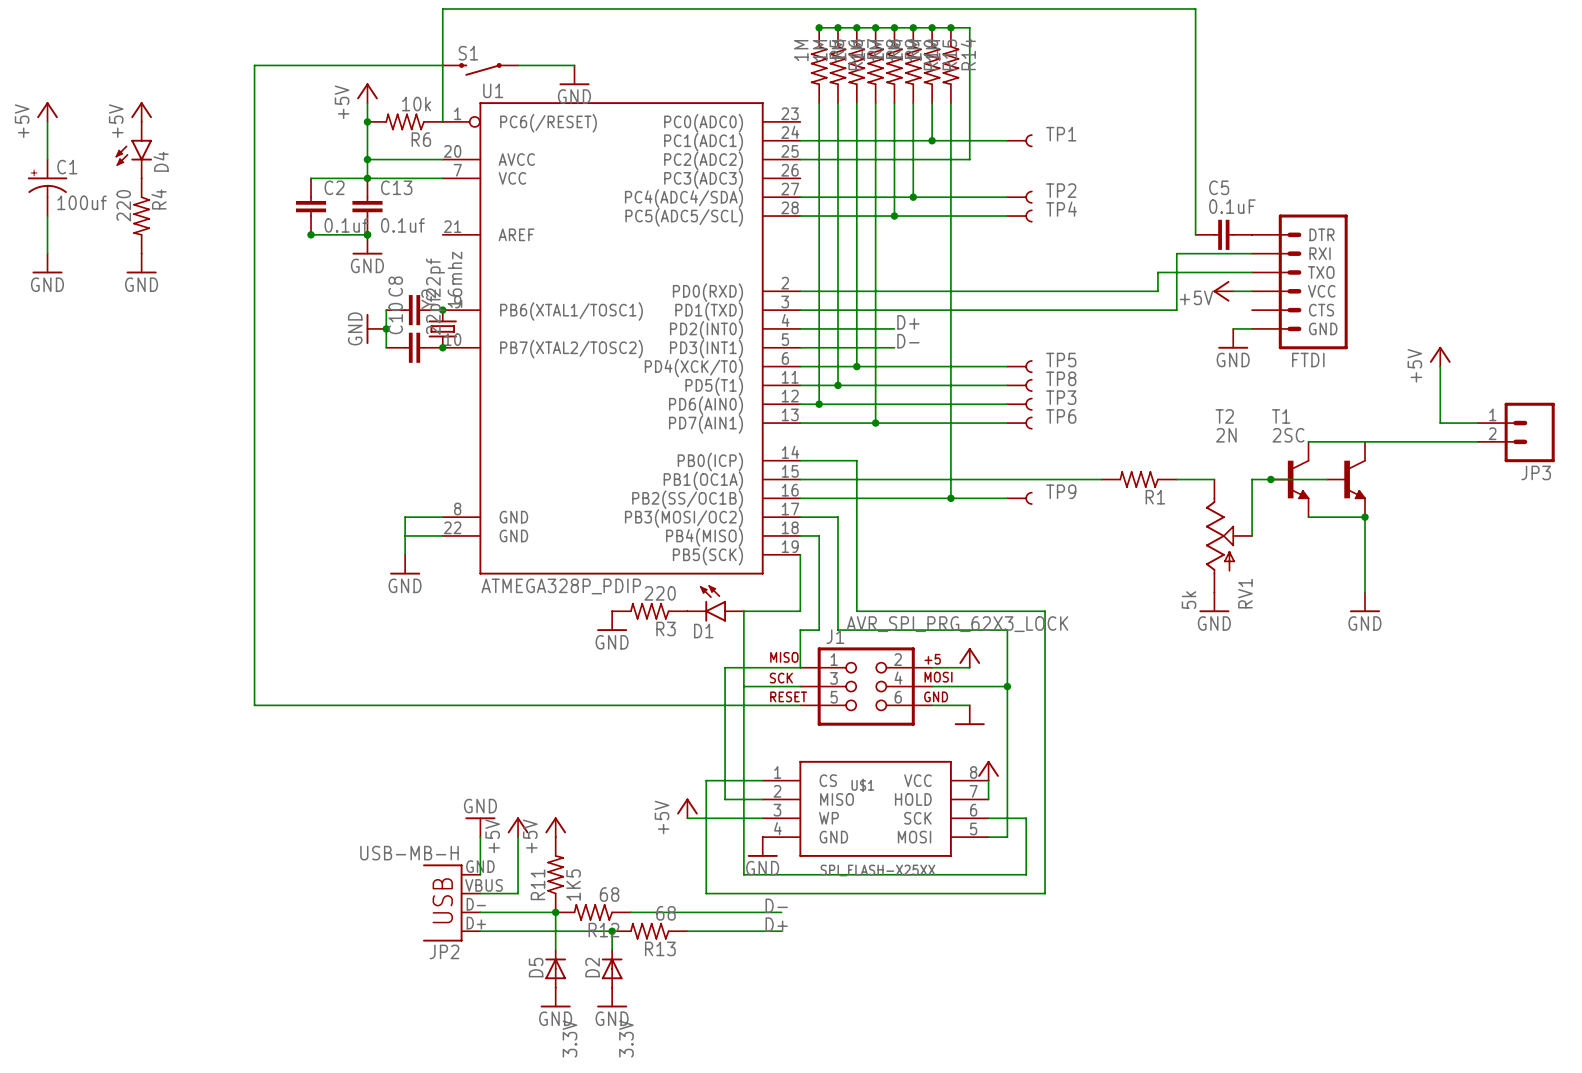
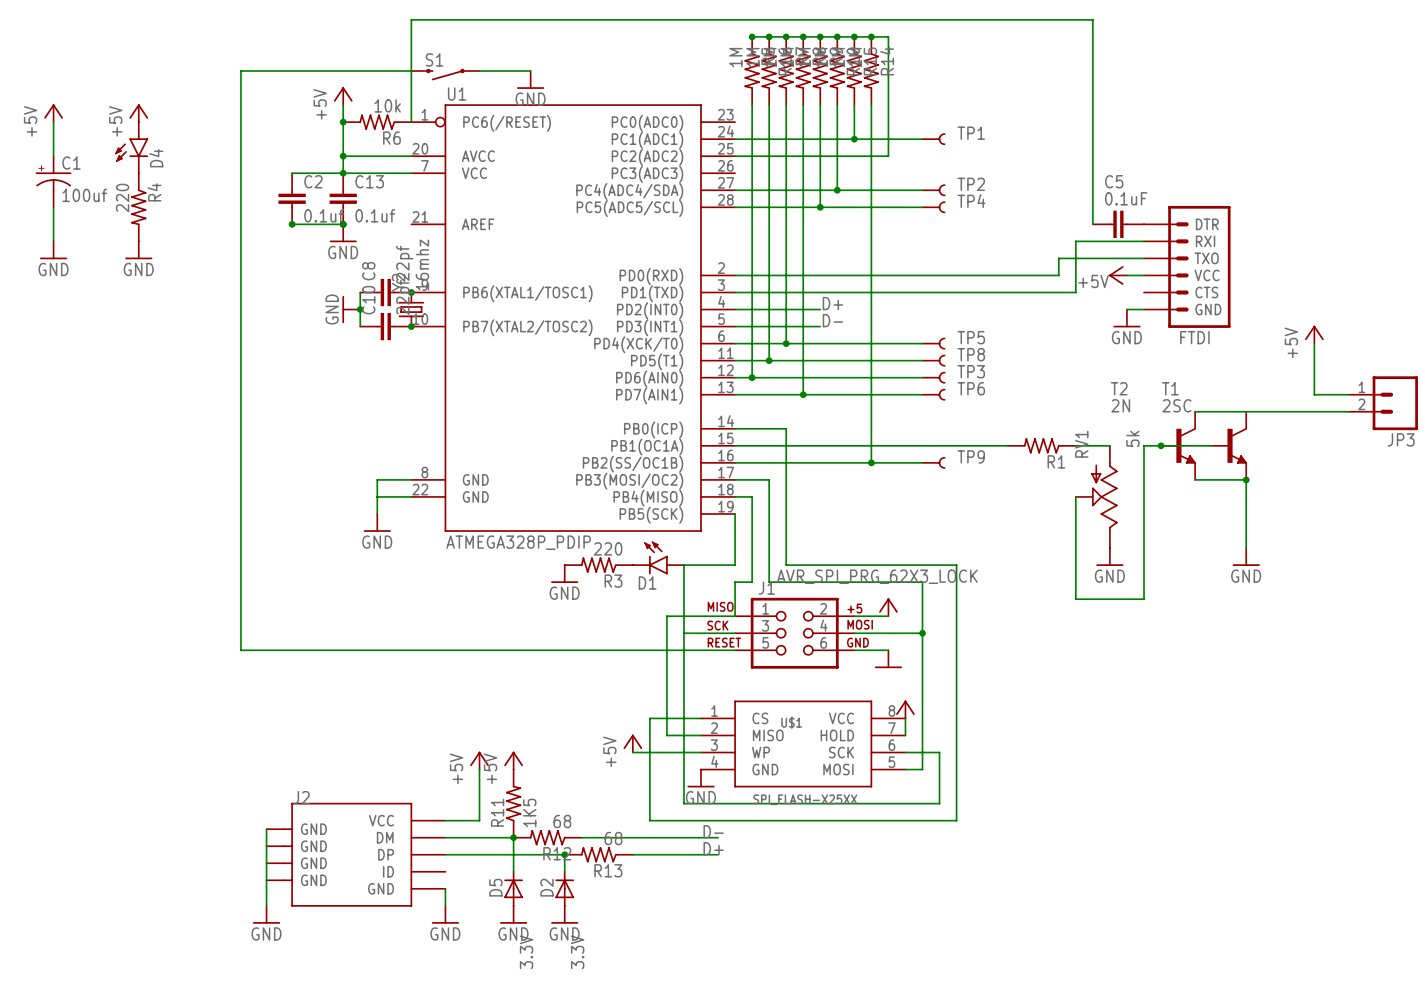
wire: none -> (1075, 496) (1075, 599) (1143, 599) (1143, 496)
RV1 rotation: 0° (1220, 535) -> 180° (1104, 496)
power symbol: GND (480, 827) -> none
wire: (480, 837) (480, 874) -> none
wire: none -> (266, 829) (266, 905)
JP2: USB-MB-H (451, 902) -> none
J2: none -> (355, 854)
wire: none -> (445, 888) (445, 905)
power symbol: none -> GND (266, 914)
power symbol: none -> GND (445, 914)

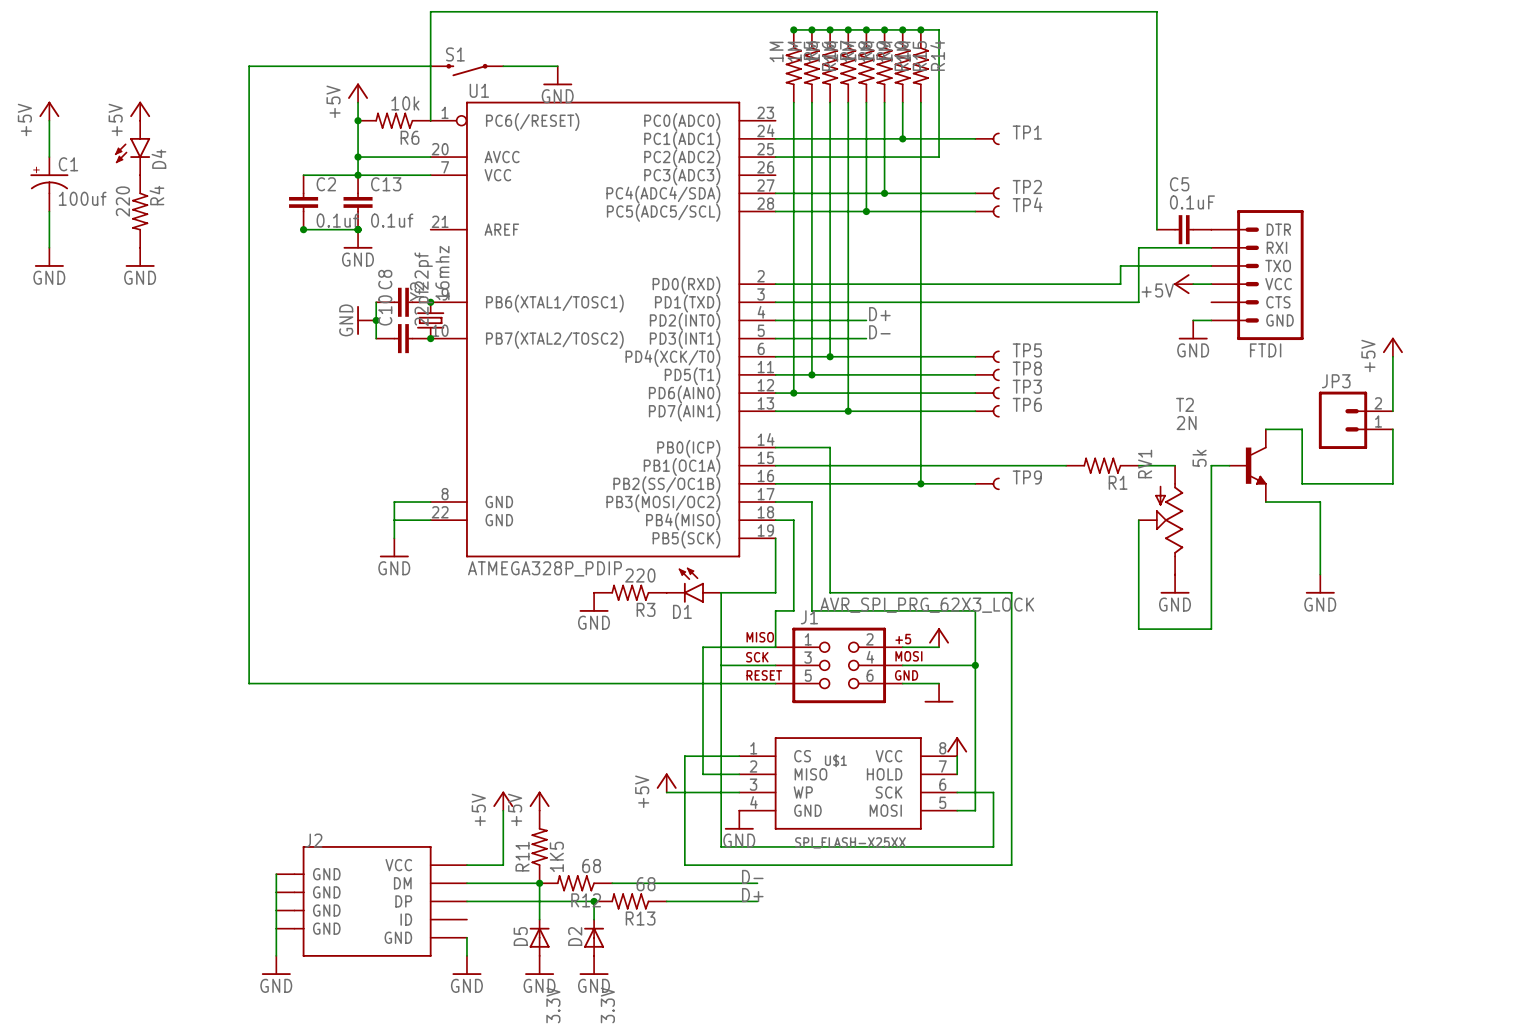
wire: (1314, 394) (1348, 394) -> none
JP3 position: (1383, 403) -> (1355, 420)
JP3 rotation: 0° (1395, 403) -> 180° (1343, 420)
wire: (1229, 411) (1348, 411) -> (1302, 429) (1302, 483) (1392, 483) (1392, 429)
wire: (1161, 445) (1212, 445) -> none
junction: (1161, 445) -> none
T1: 2SC (1229, 445) -> none
junction: (1246, 479) -> none

